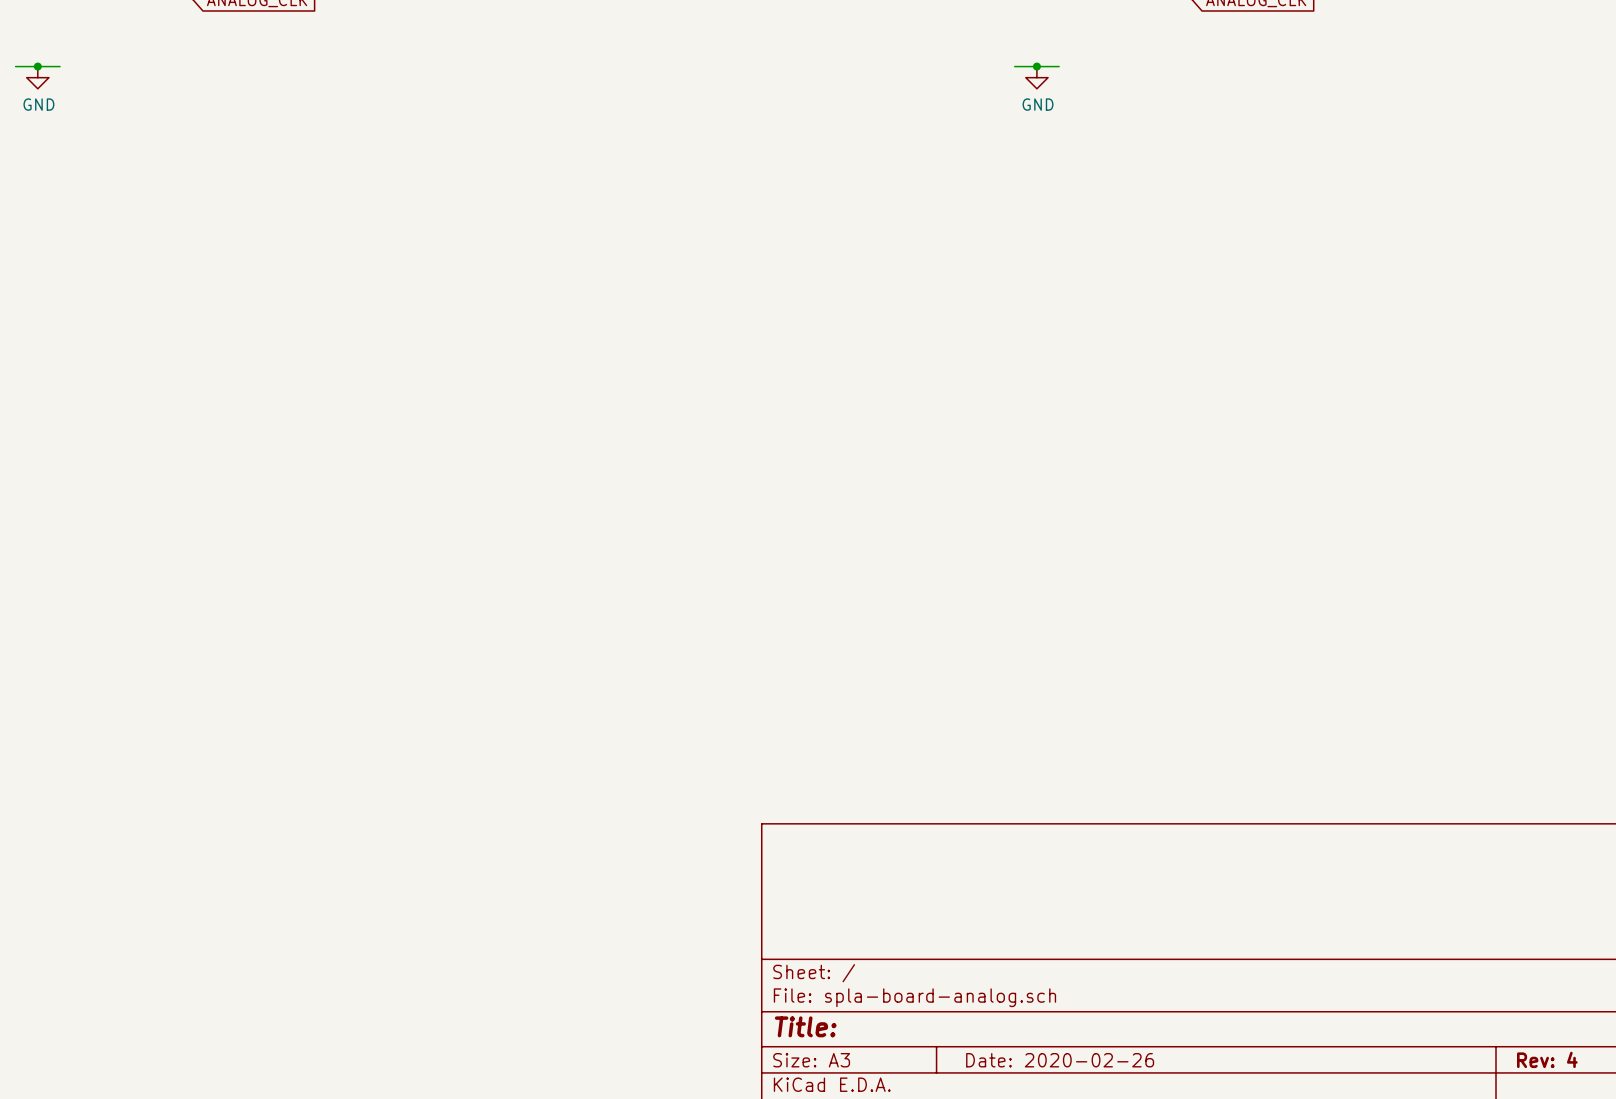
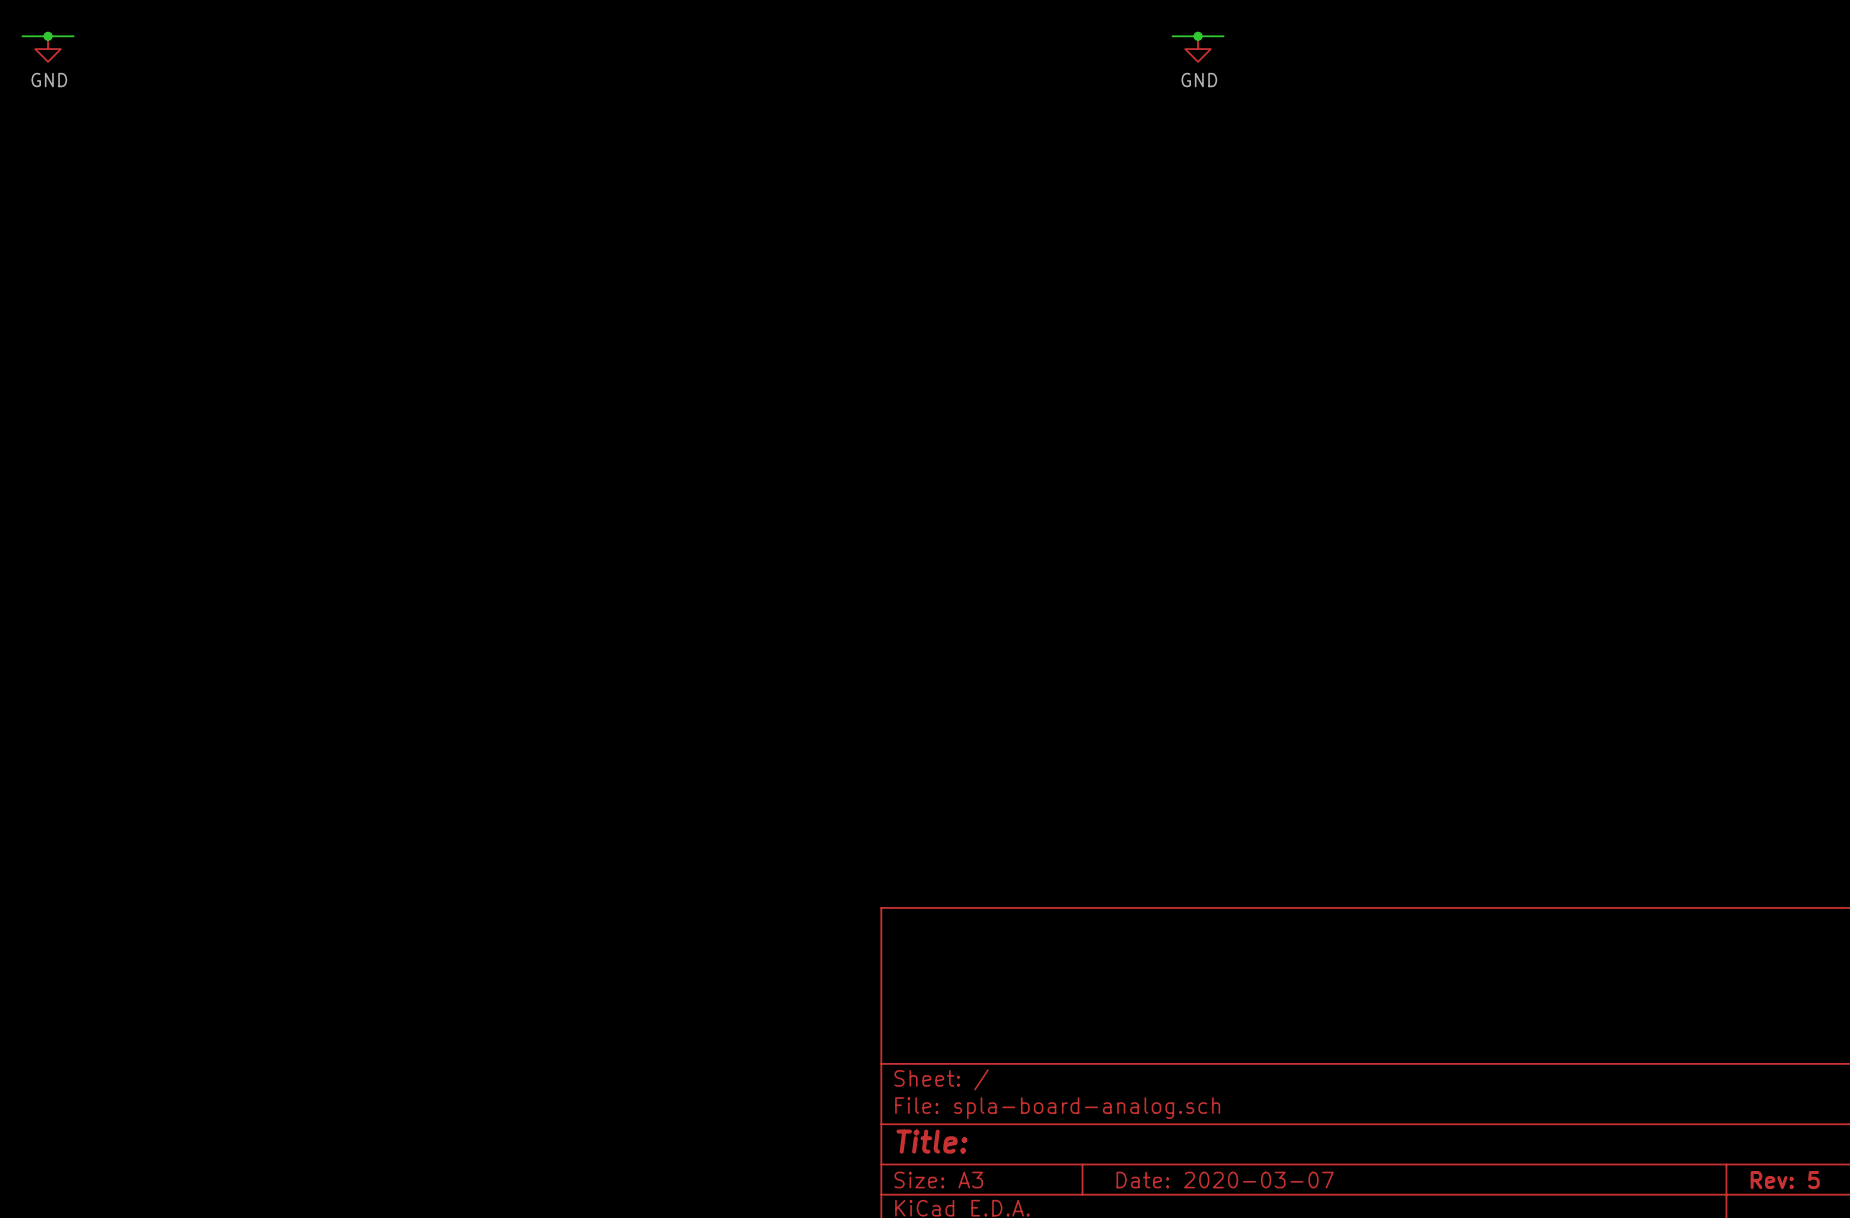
title block: Rev: 4 (1547, 1059) -> Rev: 5 (1785, 1180)
title block: Date: 2020-02-26 (1060, 1060) -> Date: 2020-03-07 (1225, 1180)

